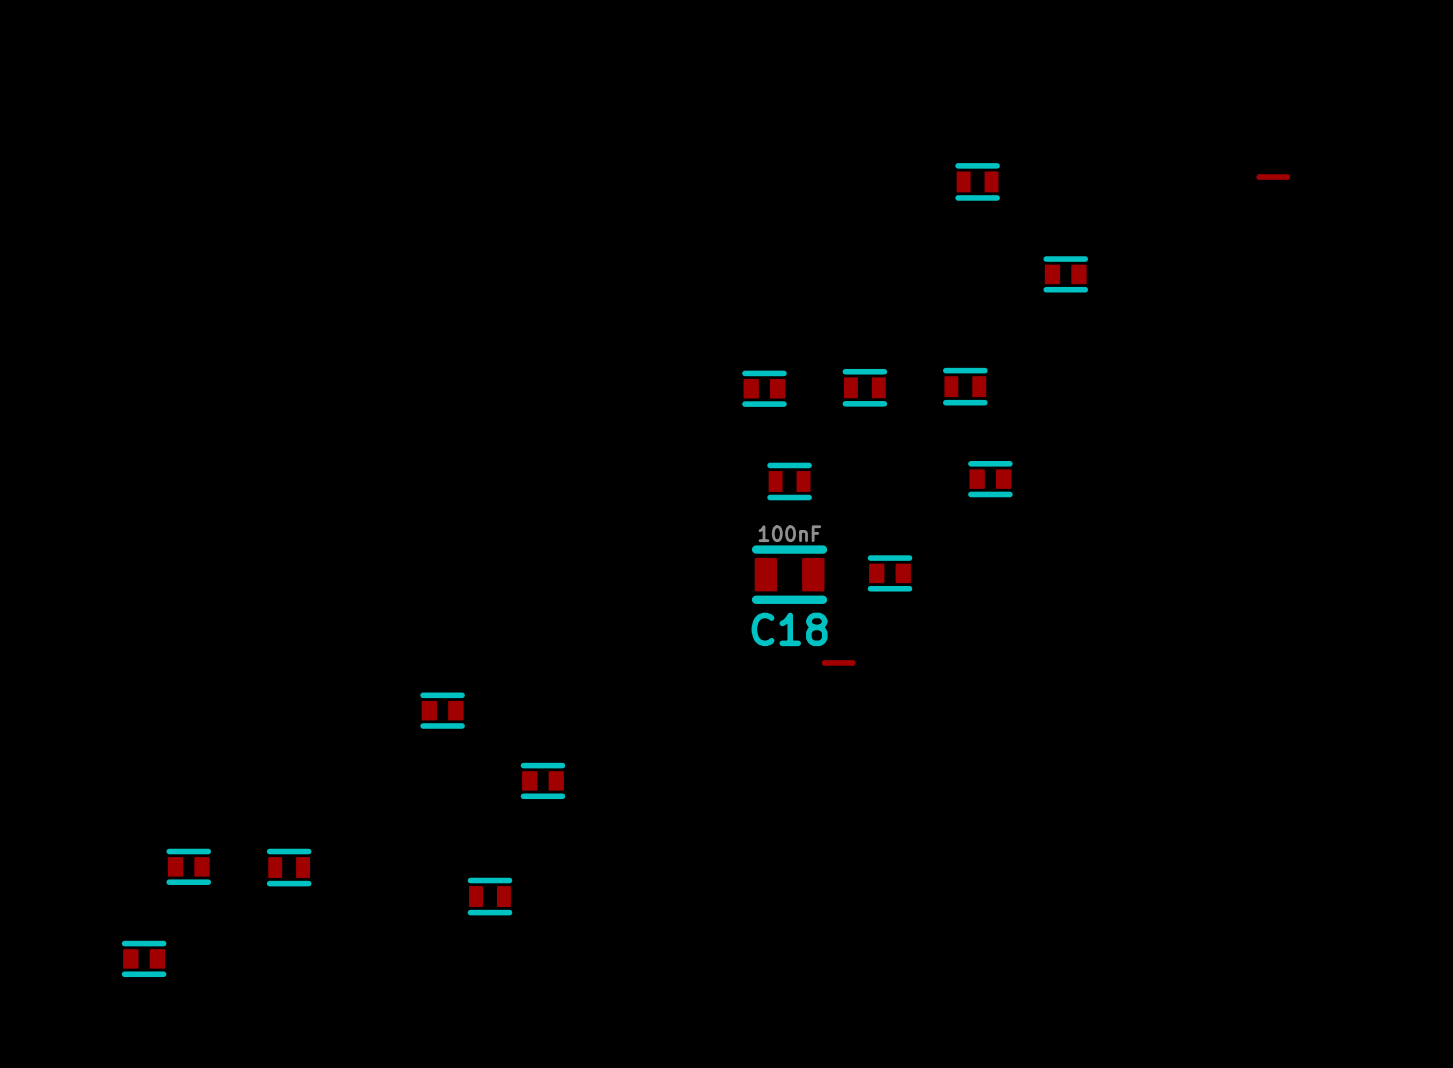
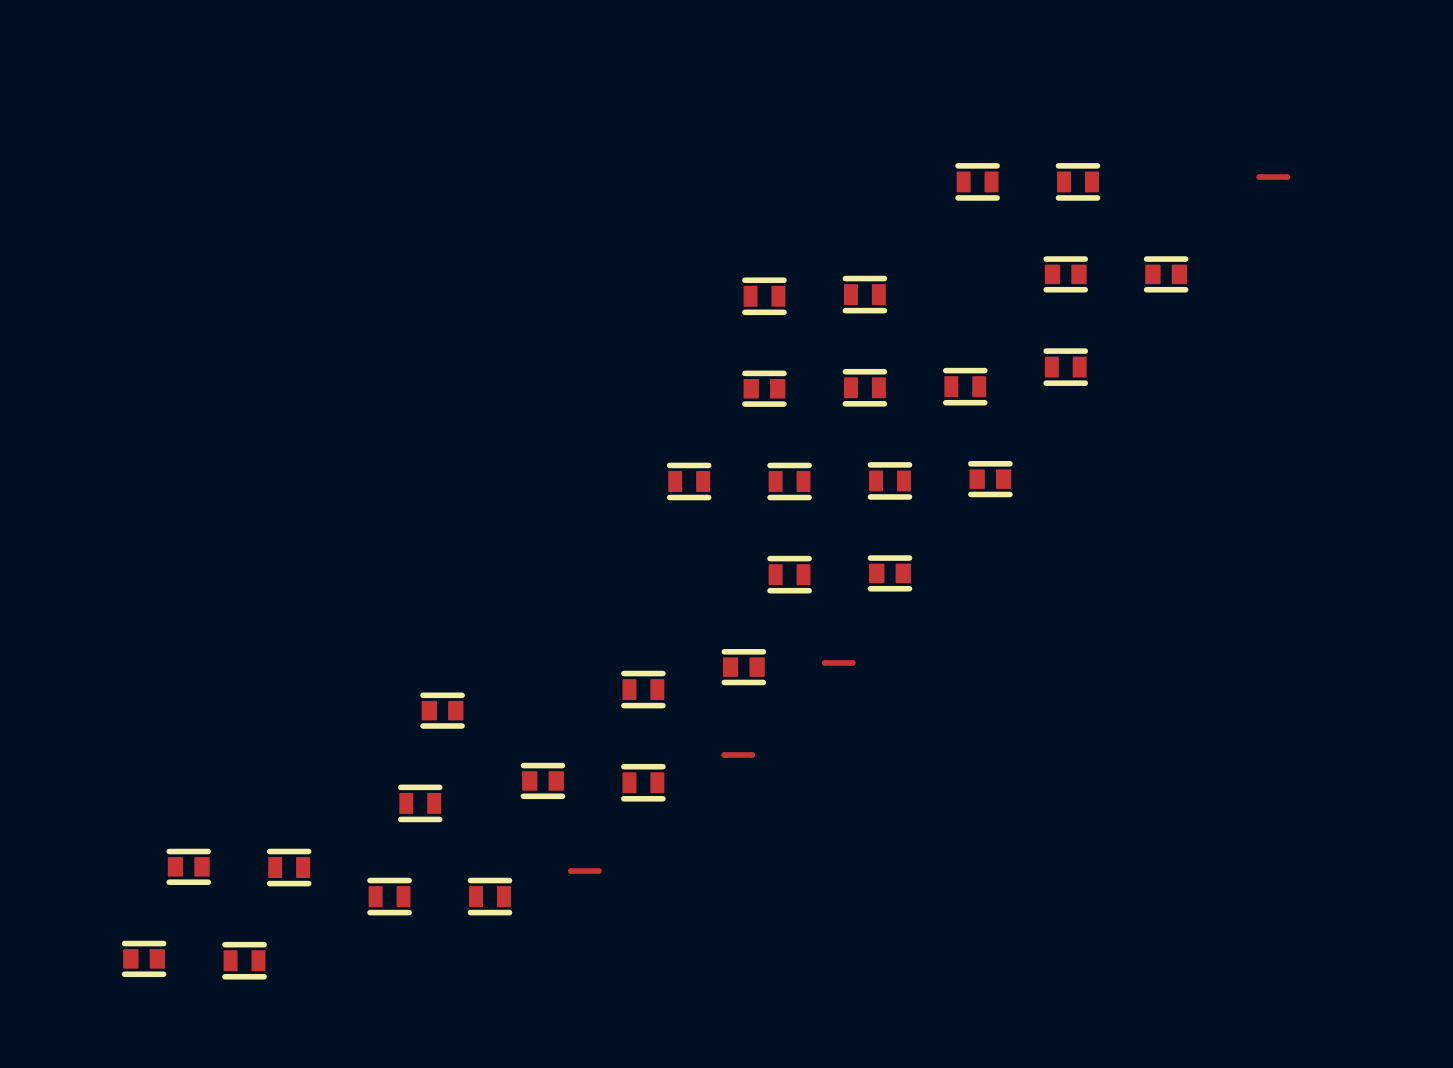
part: none -> (1077, 181)
part: none -> (1166, 274)
part: none -> (864, 294)
part: none -> (764, 296)
part: none -> (1065, 367)
part: none -> (889, 480)
part: none -> (689, 481)
C18: 100nF (789, 574) -> none
part: none -> (789, 574)
part: none -> (743, 667)
part: none -> (643, 689)
part: none -> (738, 755)
part: none -> (643, 782)
part: none -> (420, 803)
part: none -> (584, 871)
part: none -> (389, 896)
part: none -> (244, 960)

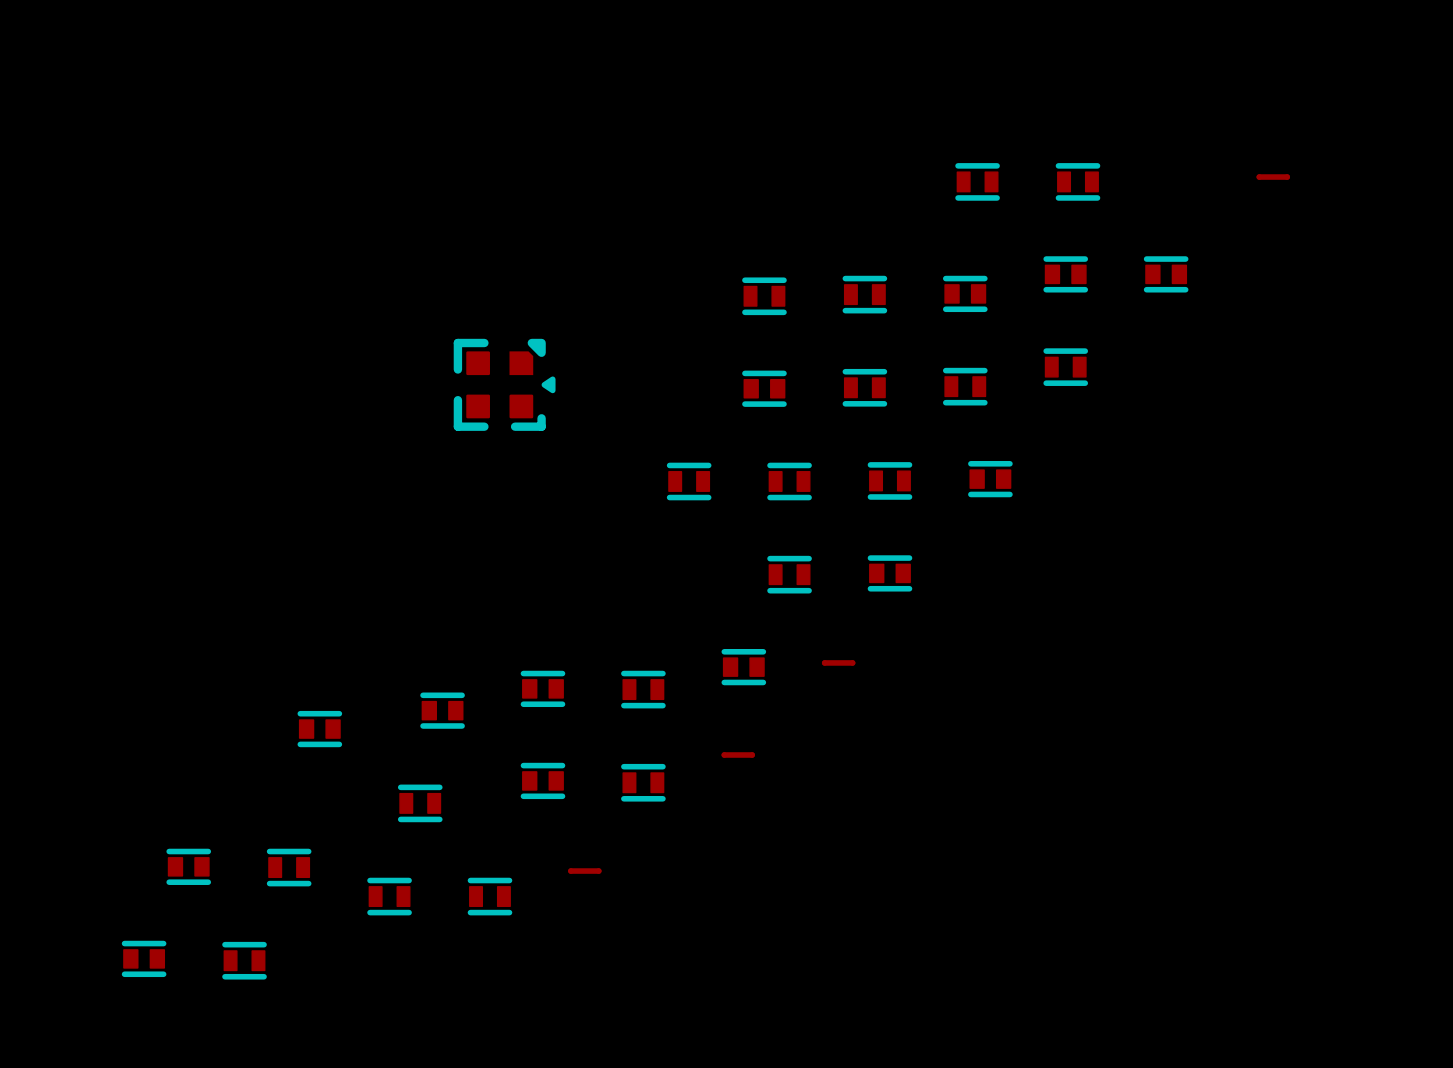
part: none -> (965, 293)
part: none -> (504, 384)
part: none -> (542, 688)
part: none -> (319, 729)

